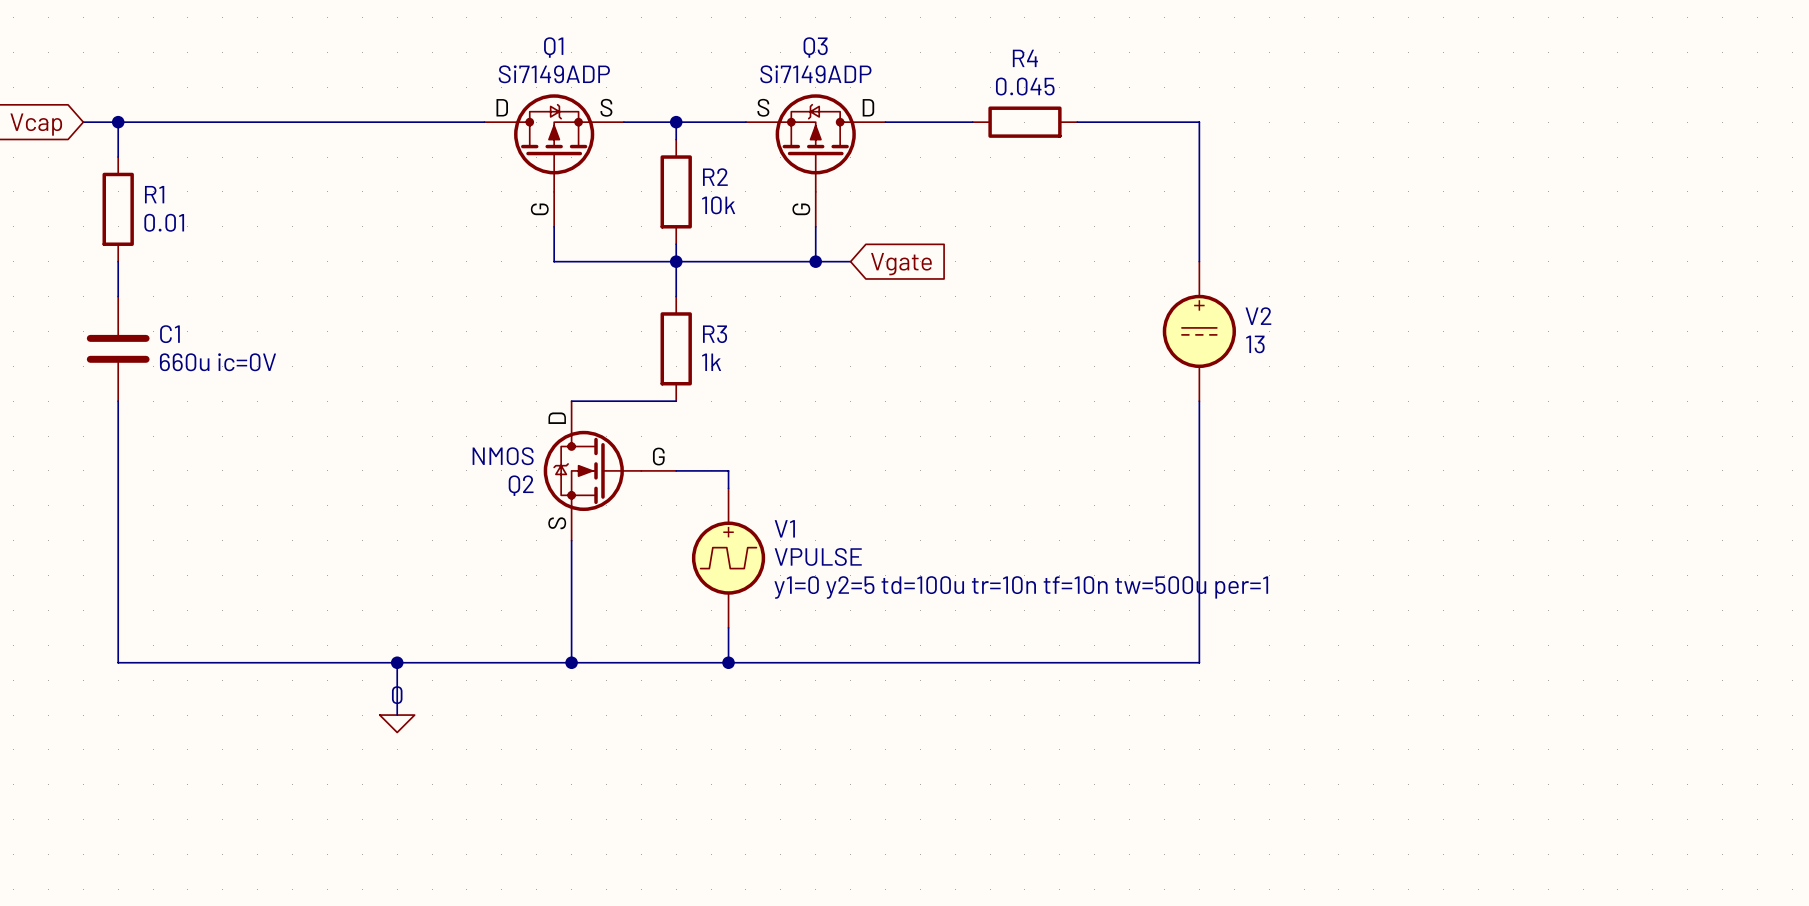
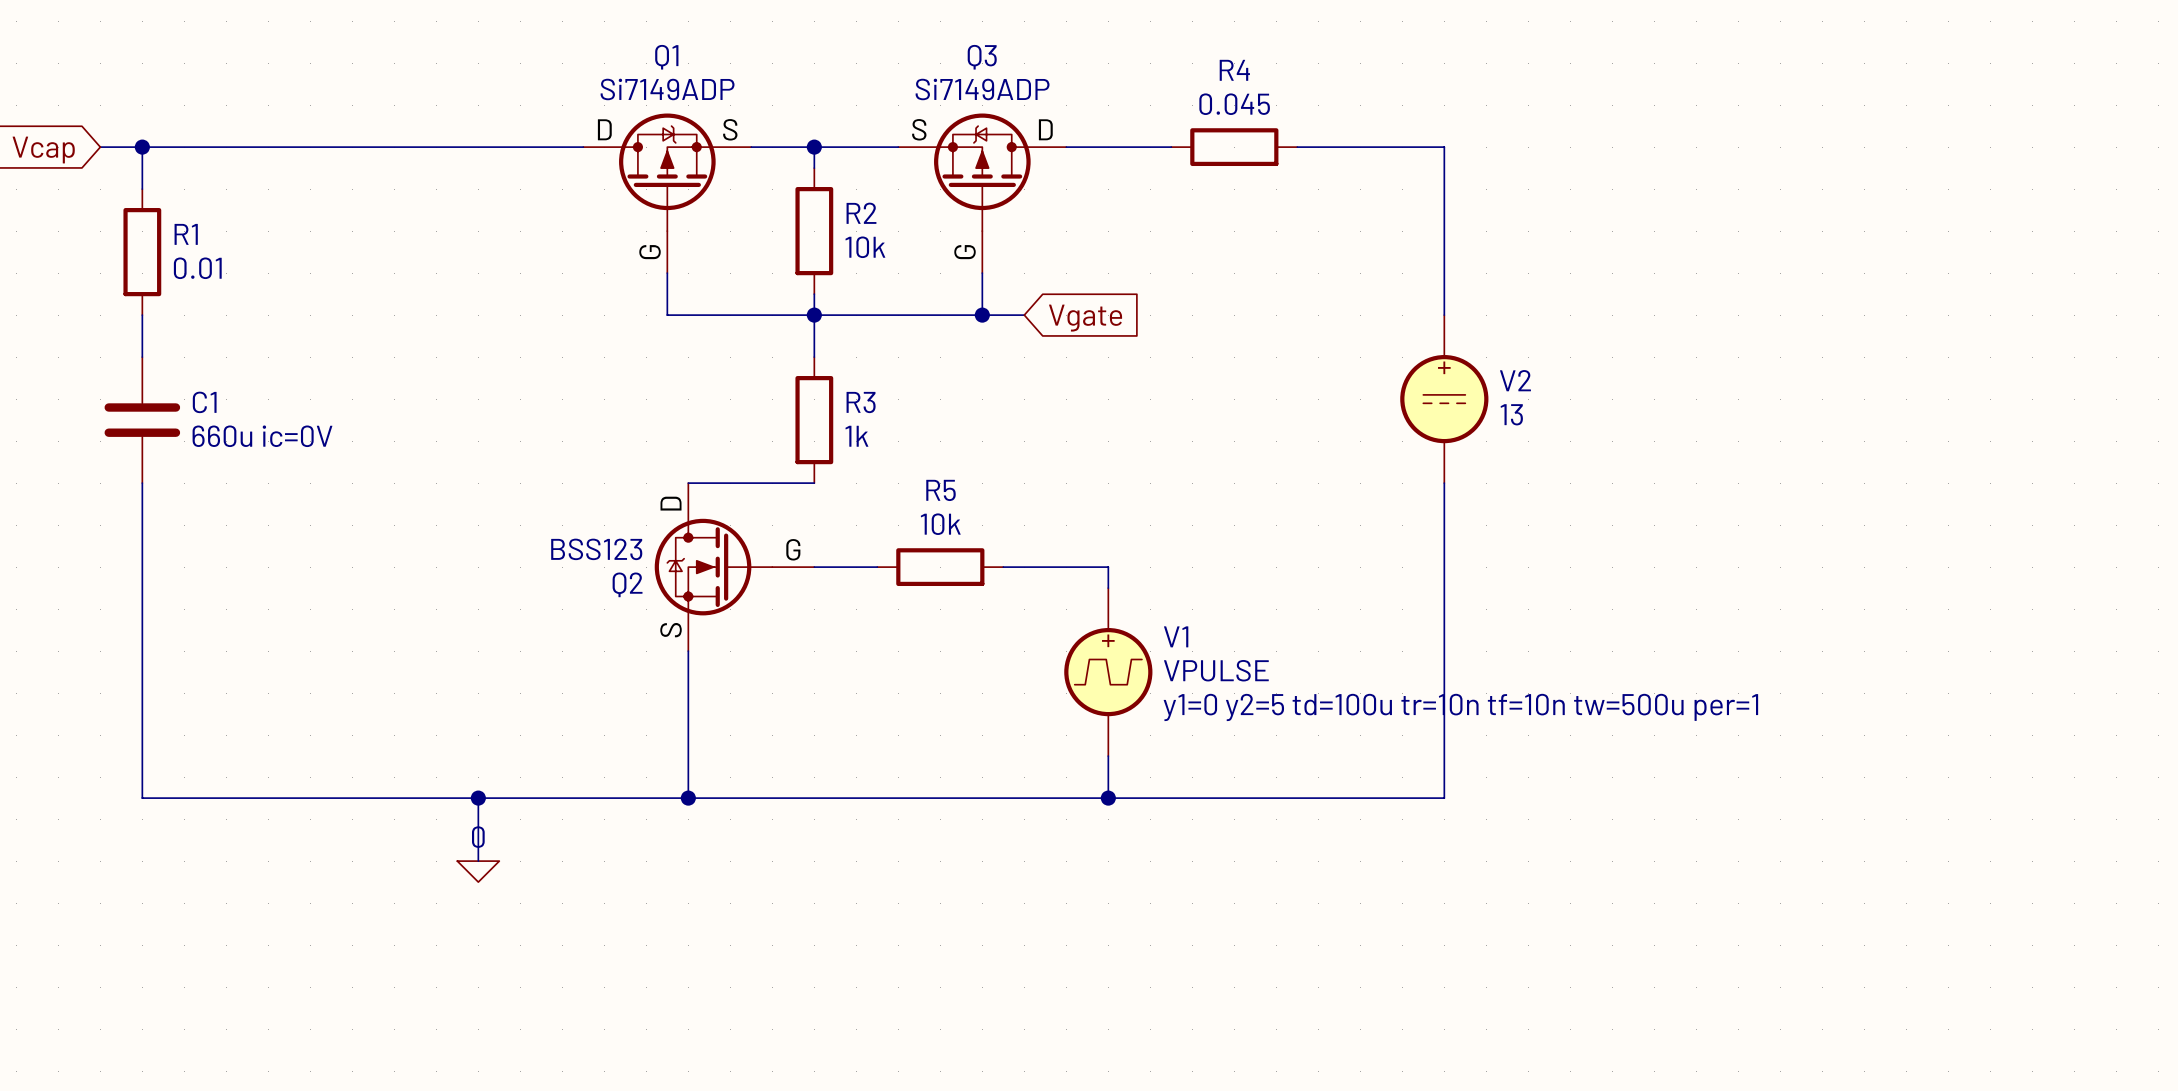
Q2 value: NMOS (503, 456) -> BSS123 (596, 549)
wire: (728, 470) (728, 488) -> none
R5: none -> 10k (940, 567)
wire: none -> (1003, 567) (1108, 567) (1108, 588)
V1 position: (728, 558) -> (1108, 672)
wire: (728, 627) (728, 662) -> (1108, 756) (1108, 798)
junction: (728, 662) -> none
junction: none -> (1108, 798)

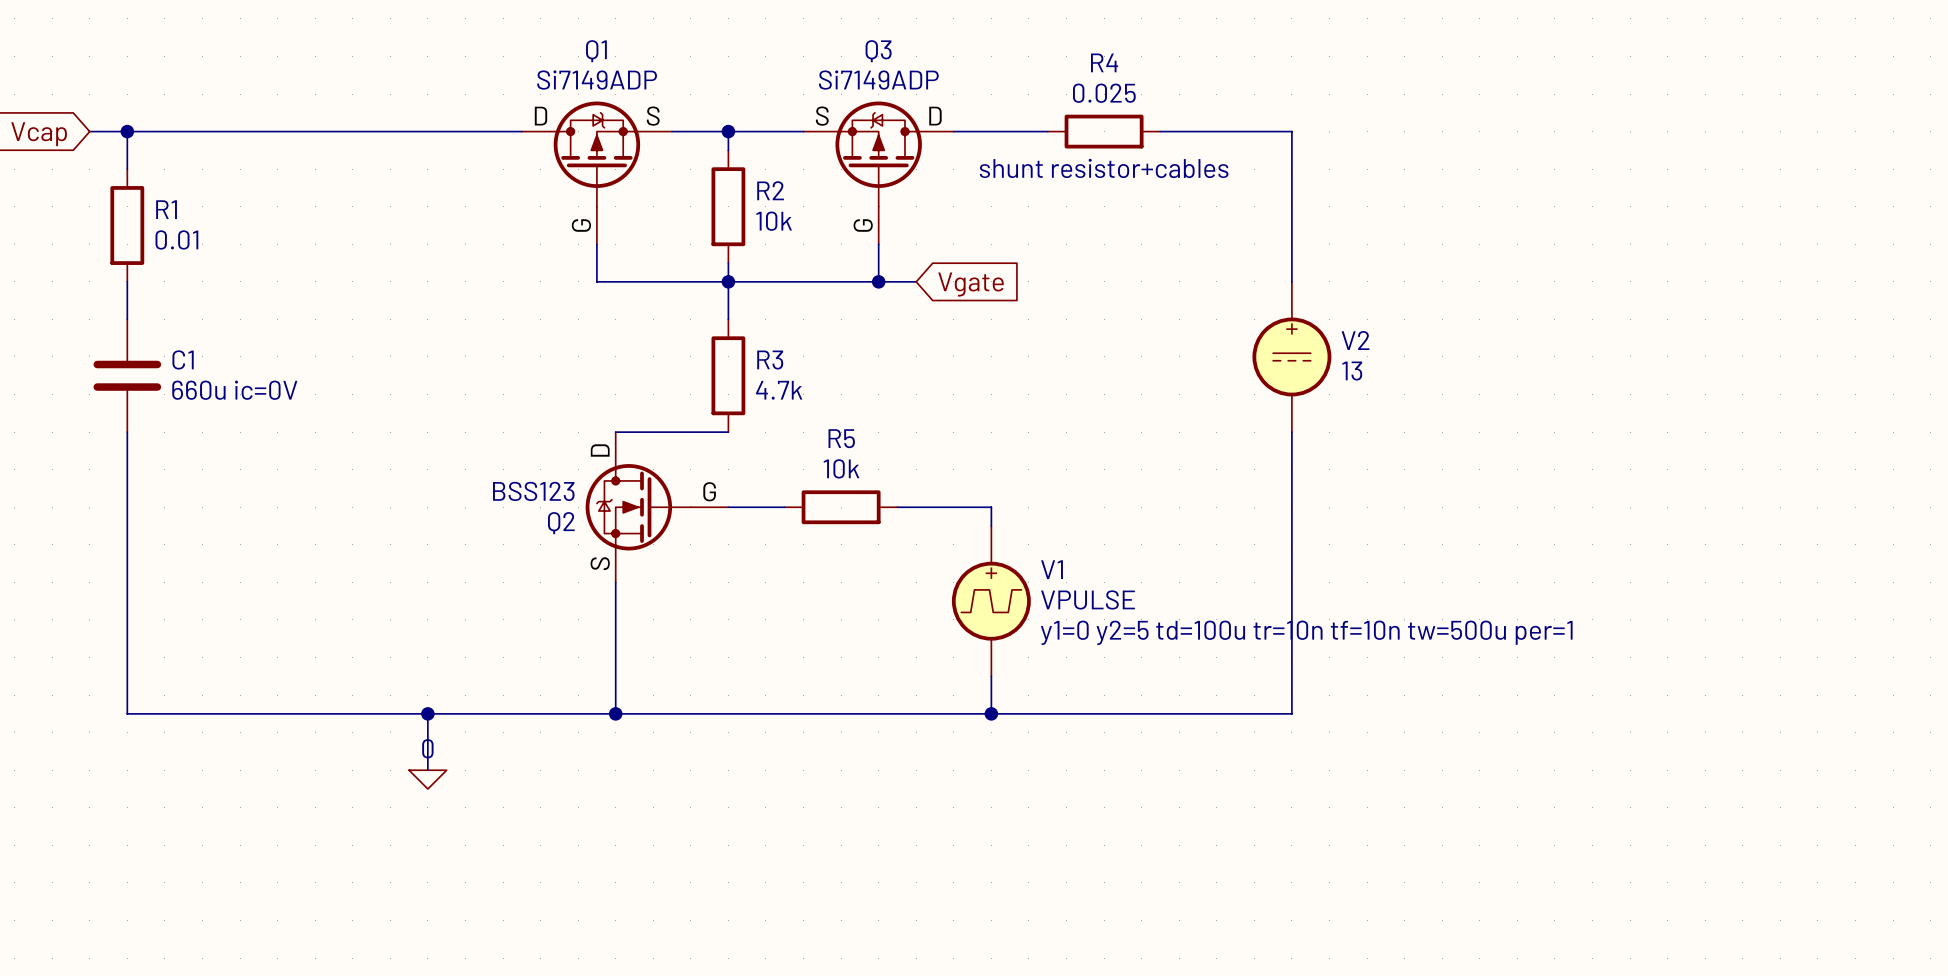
R4 value: 0.045 (1234, 104) -> 0.025 (1104, 93)
R4 text: none -> shunt resistor+cables (1104, 168)
R3 value: 1k (856, 436) -> 4.7k (779, 390)

